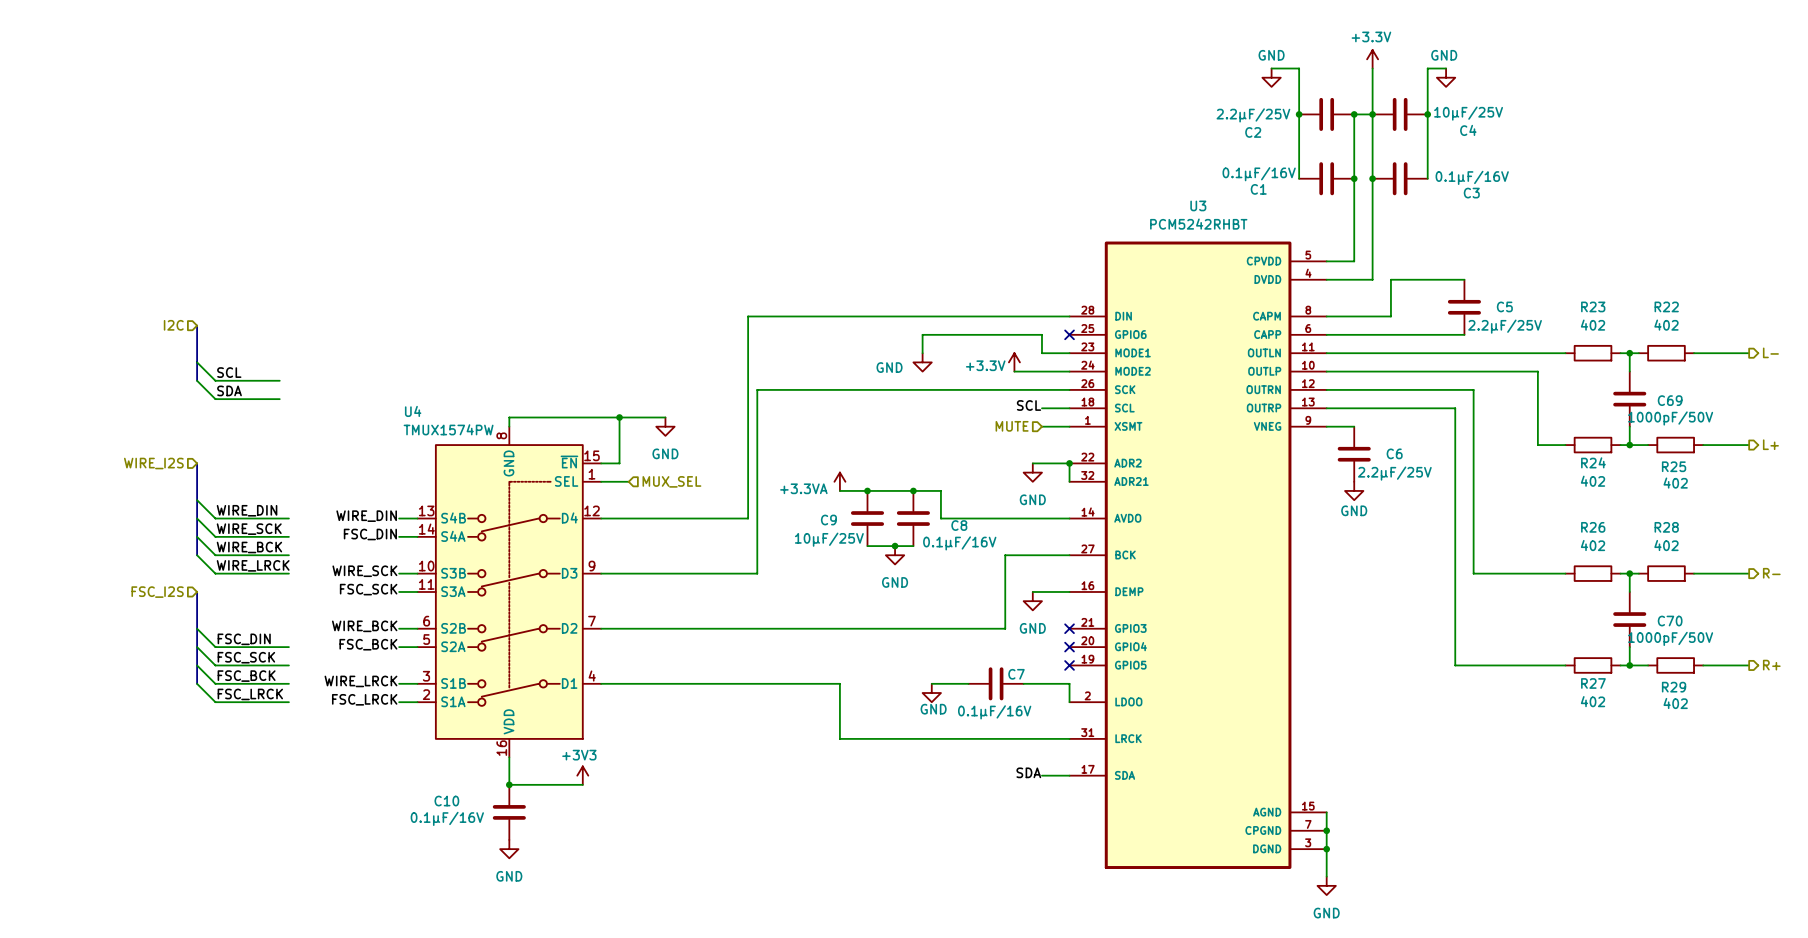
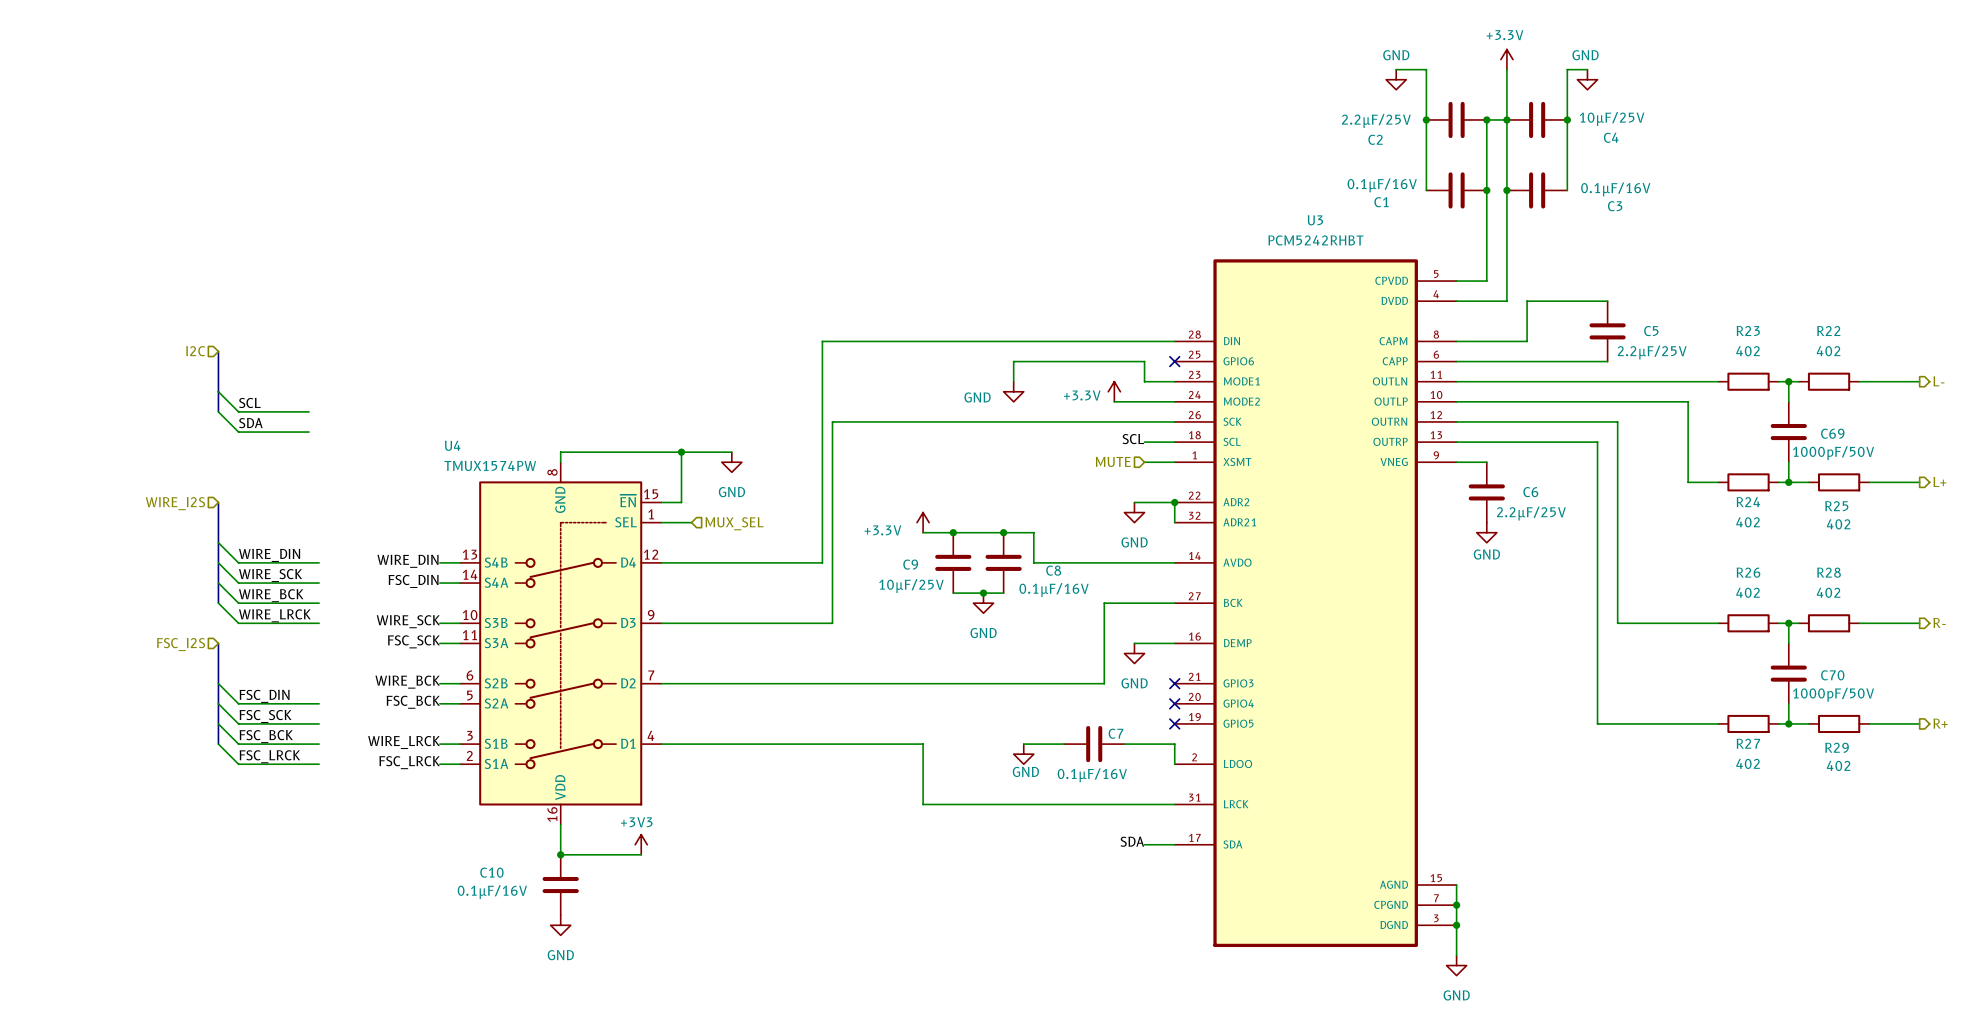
power symbol: +3.3VA (839, 481) -> +3.3V (923, 522)

